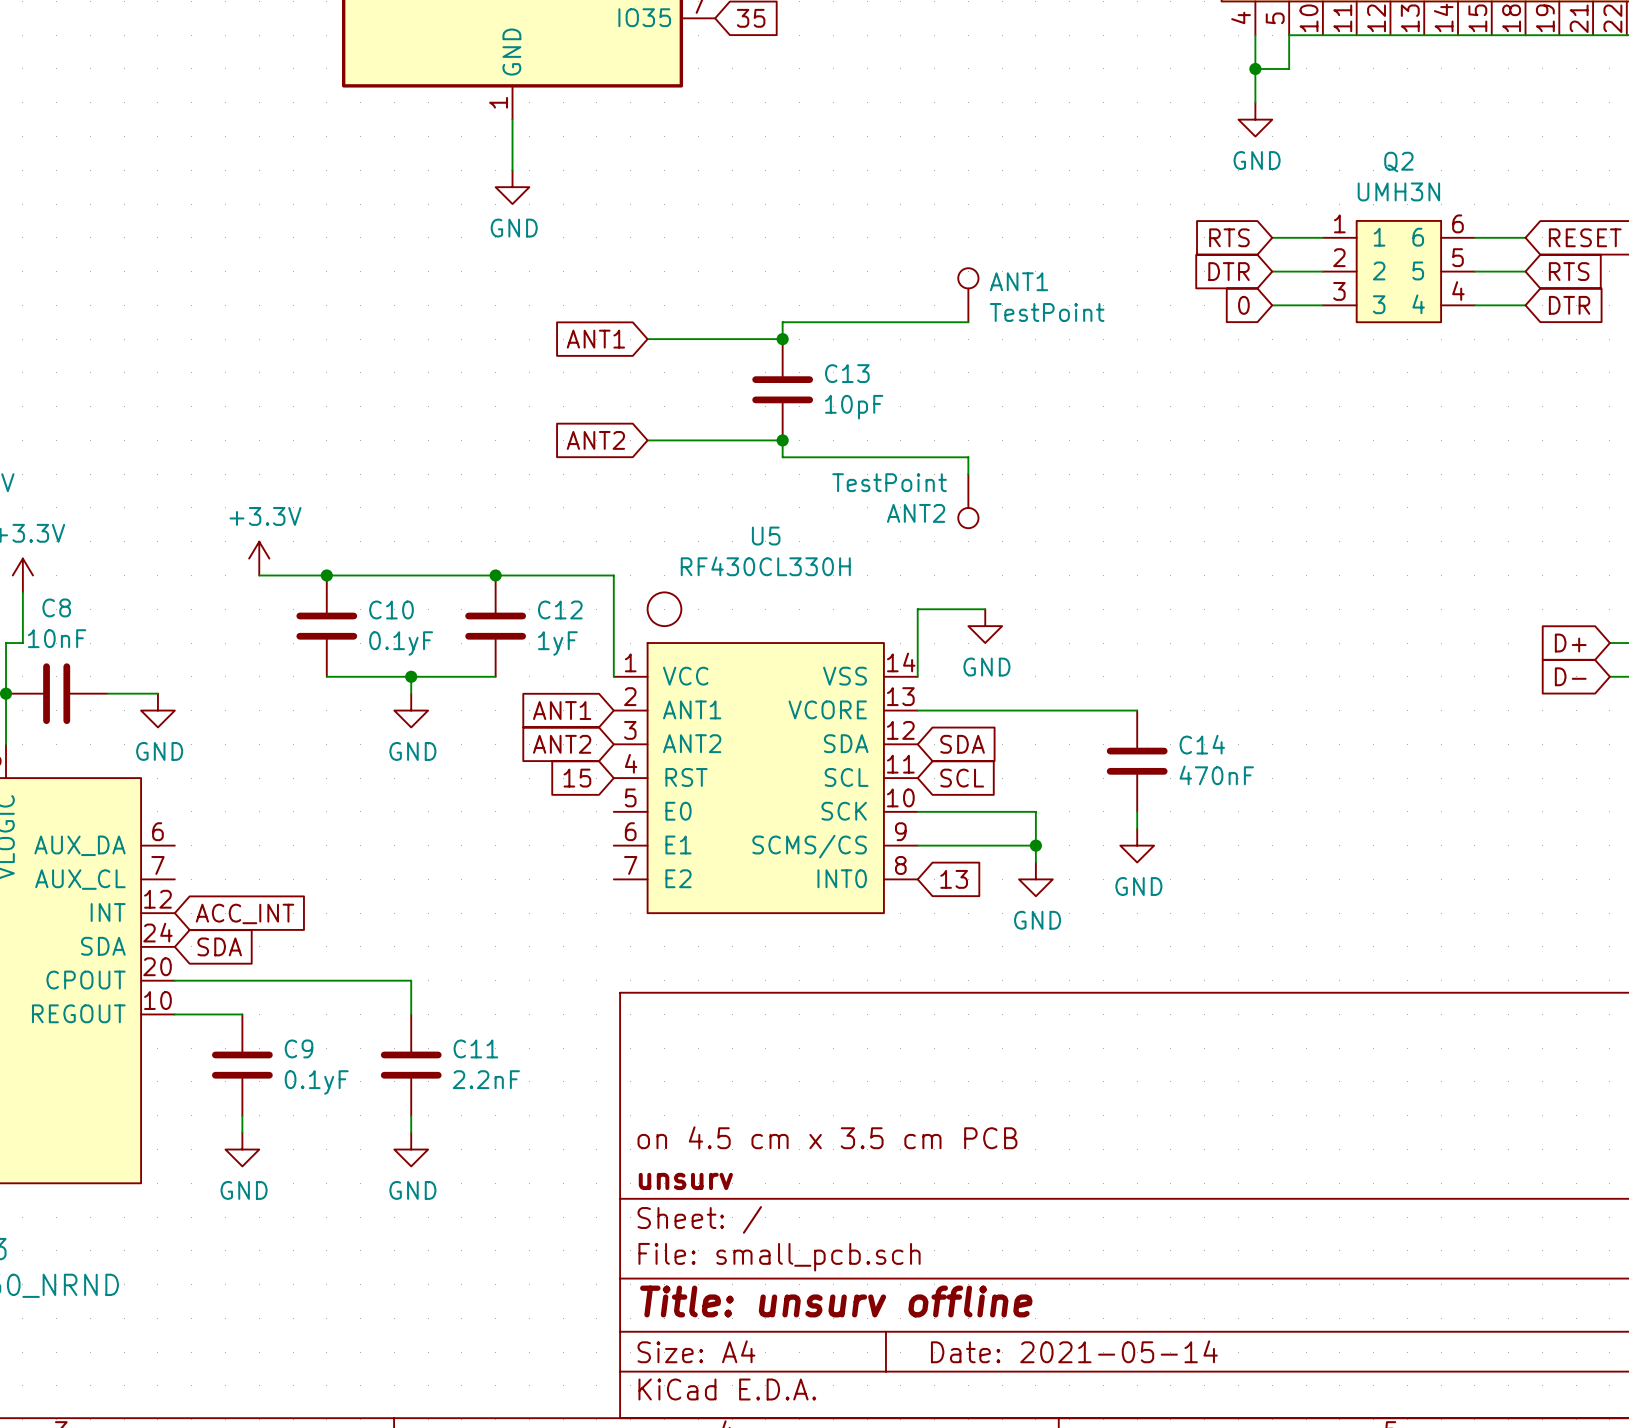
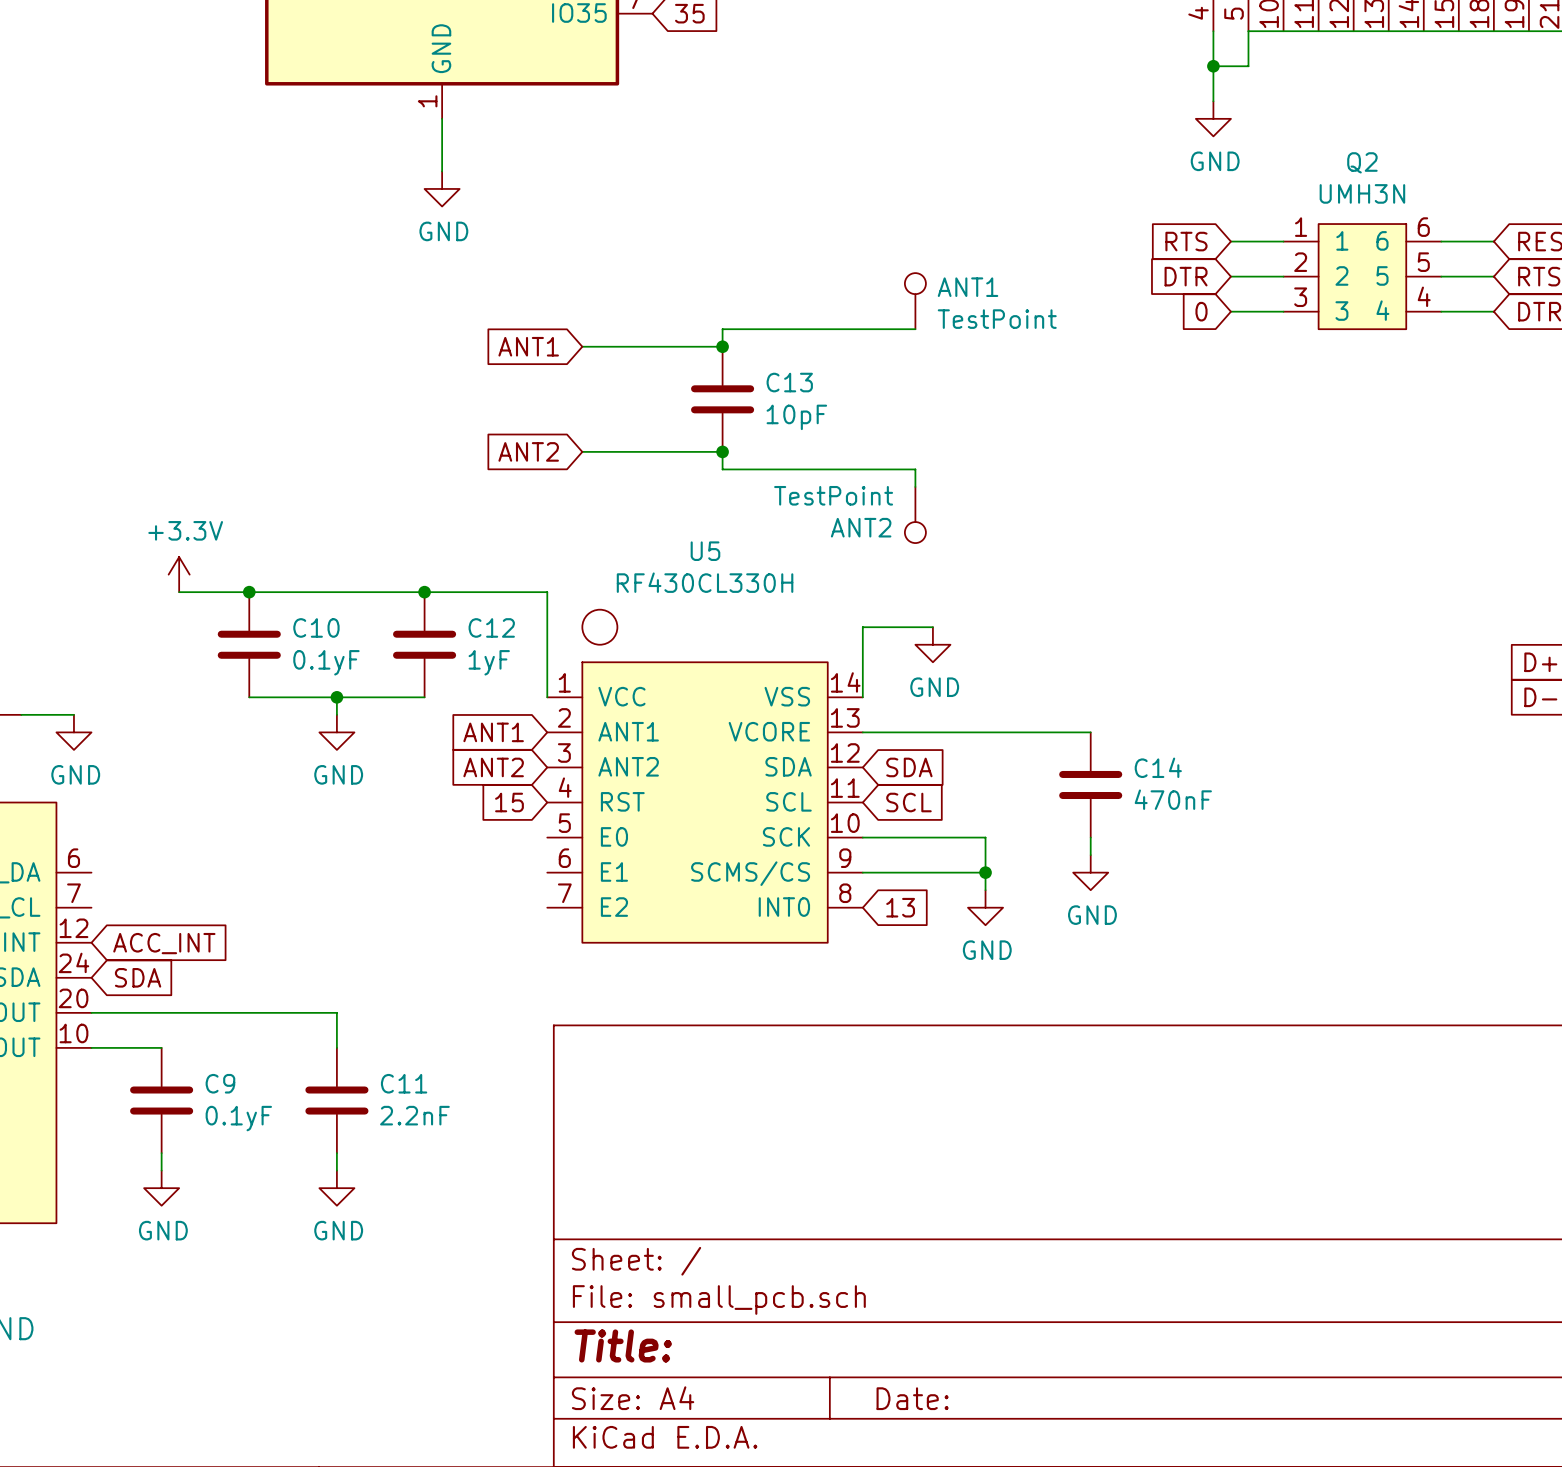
title block: on 4.5 cm x 3.5 cm PCB (827, 1137) -> none
title block: unsurv (685, 1181) -> none
title block: Title: unsurv offline (836, 1301) -> Title: (623, 1345)
title block: Date: 2021-05-14 (1074, 1351) -> Date: (912, 1398)

